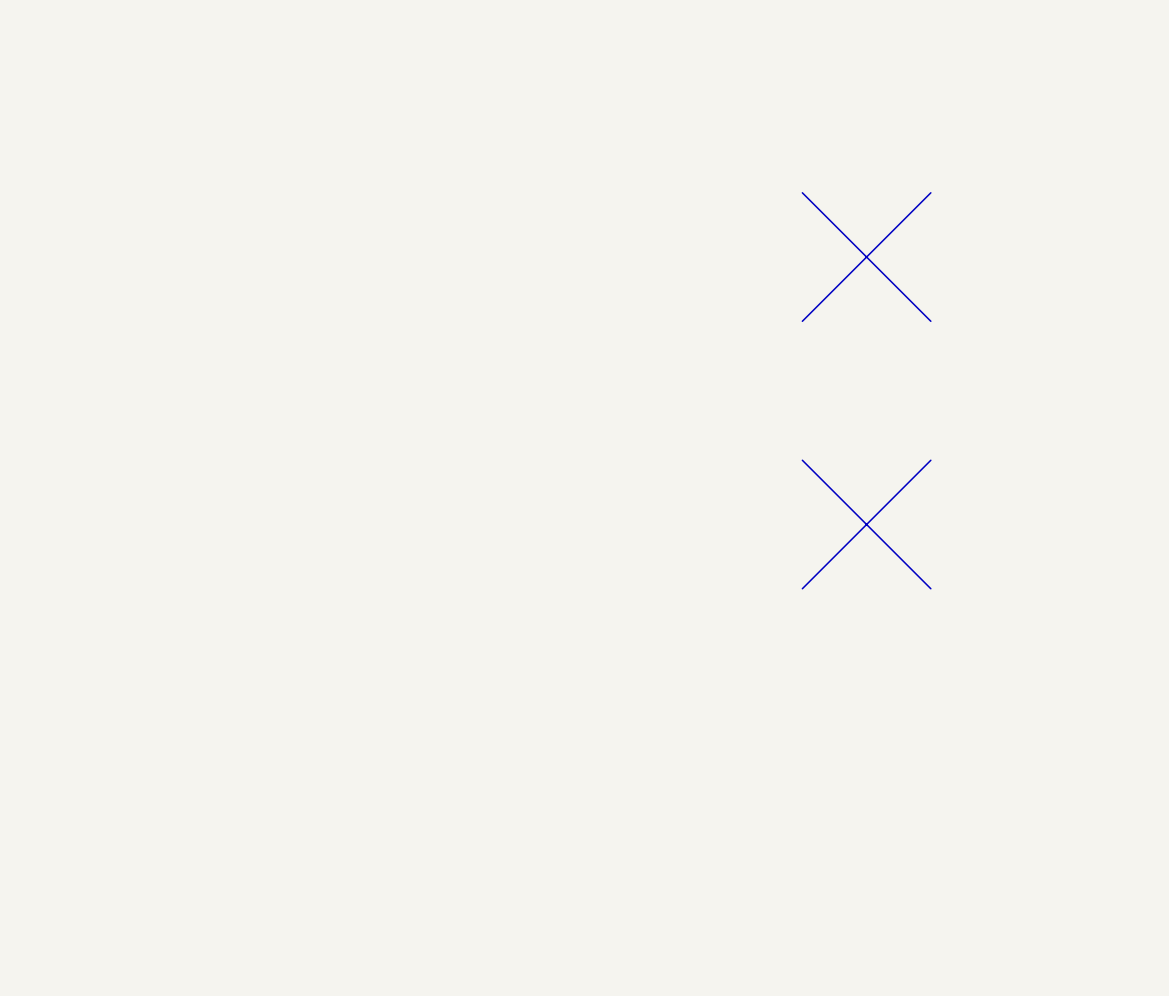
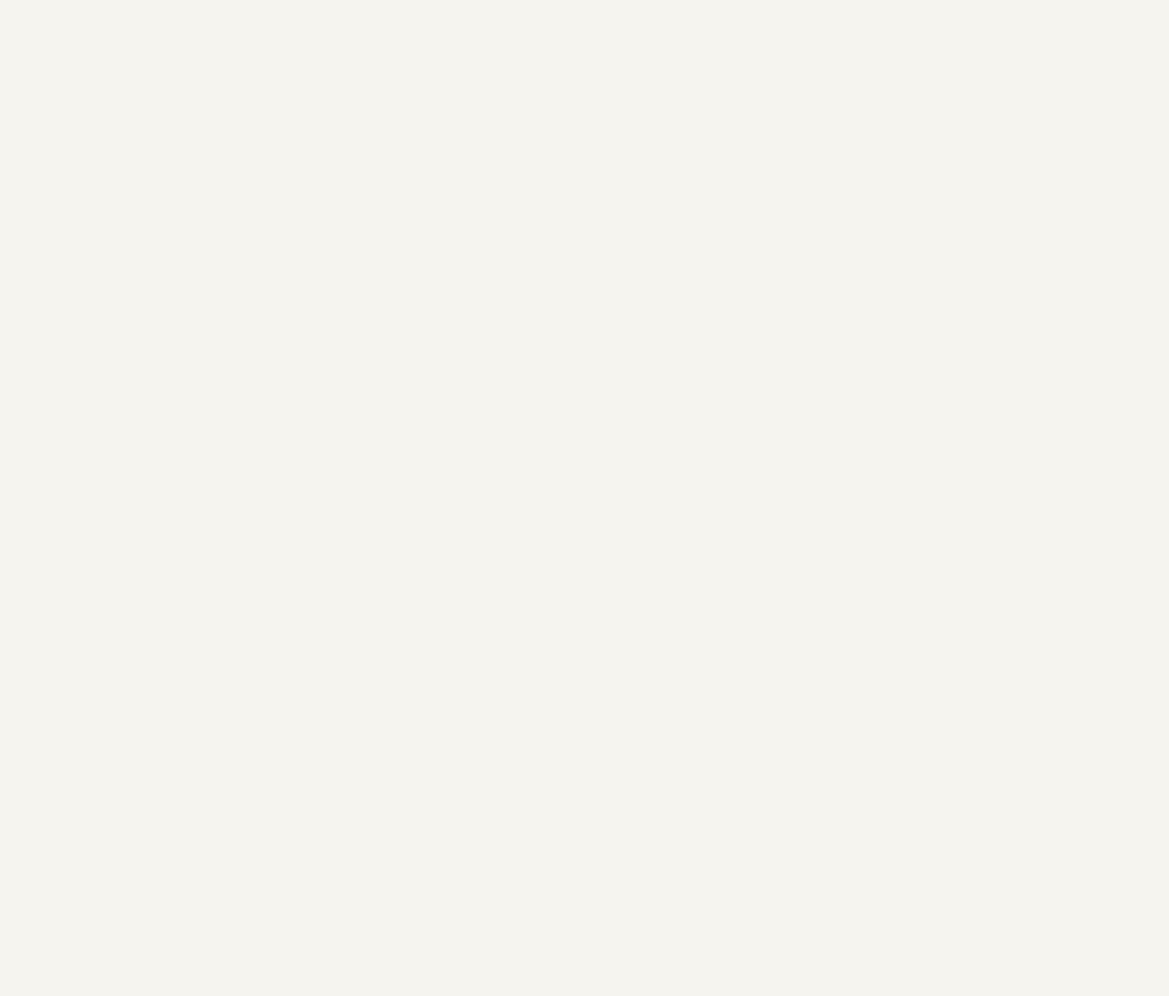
no-connect mark: (866, 257) -> none
no-connect mark: (866, 524) -> none

